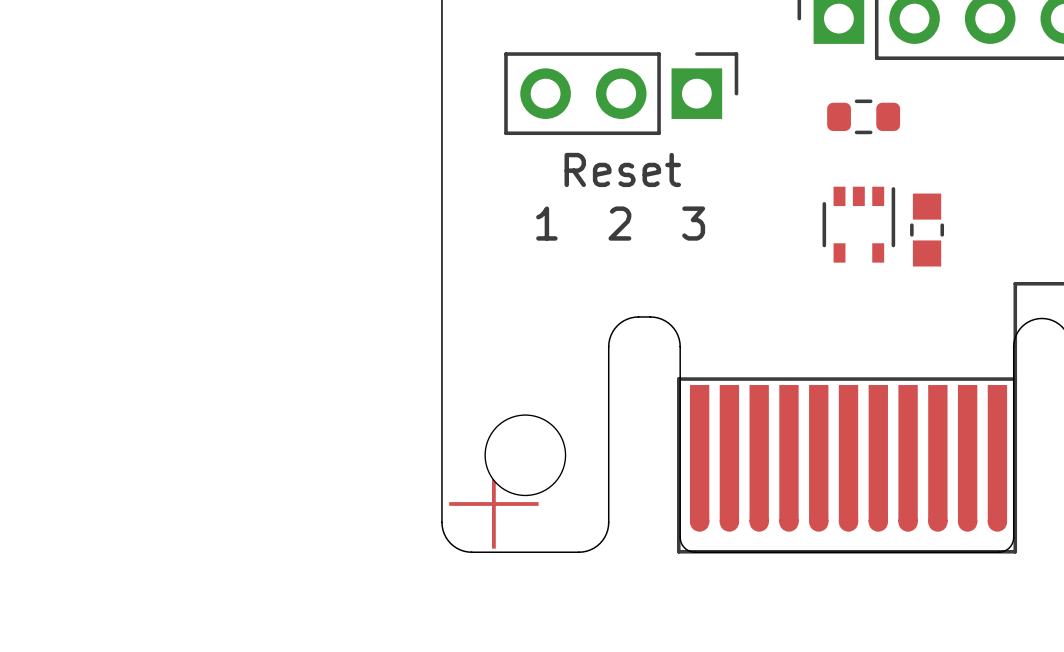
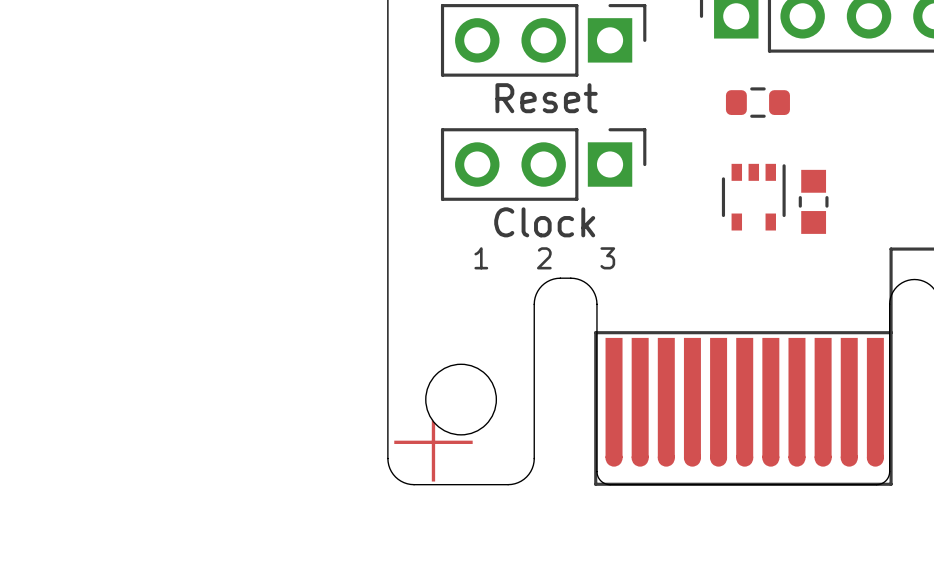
part: none -> (543, 40)
part: (621, 93) -> none
text position: Reset (622, 169) -> Reset (546, 98)
part: none -> (543, 164)
text: 1 2 3 (620, 223) -> Clock (544, 222)
text: none -> 1 2 3 (544, 258)

